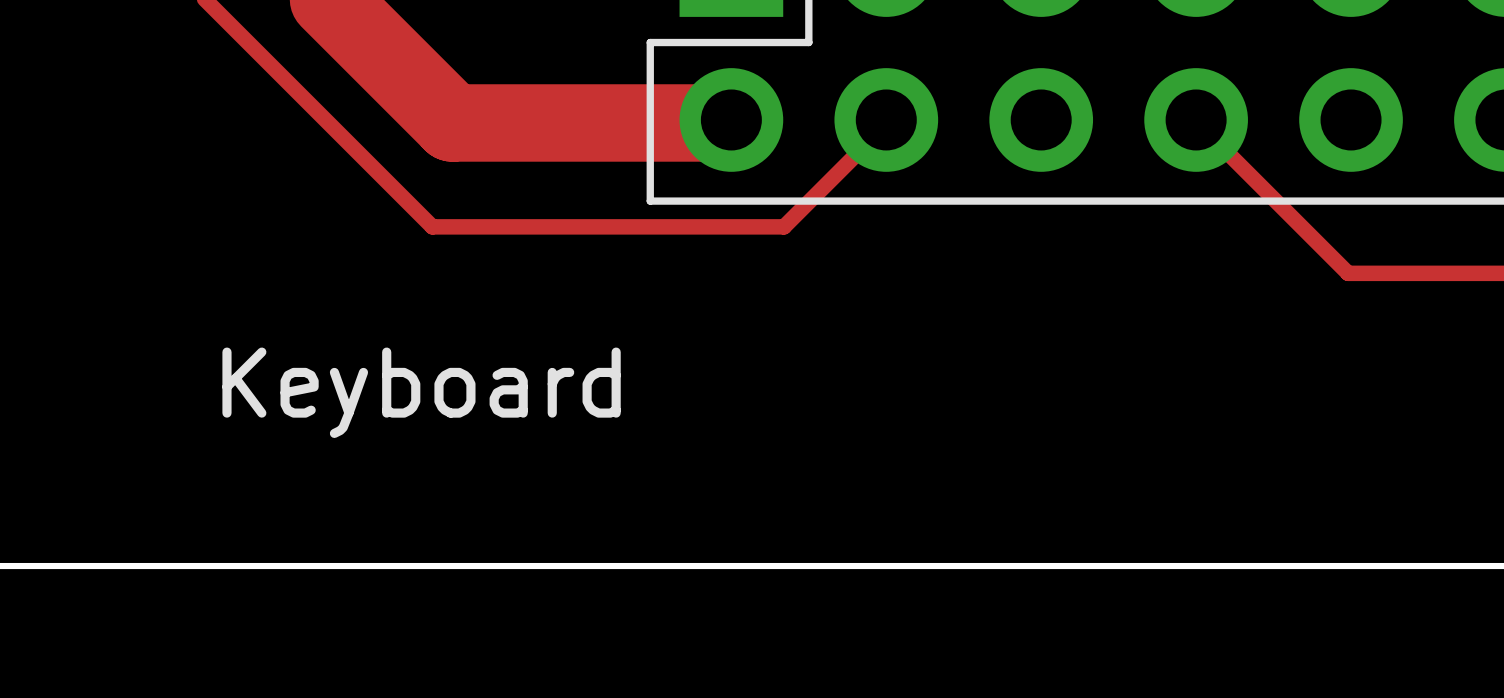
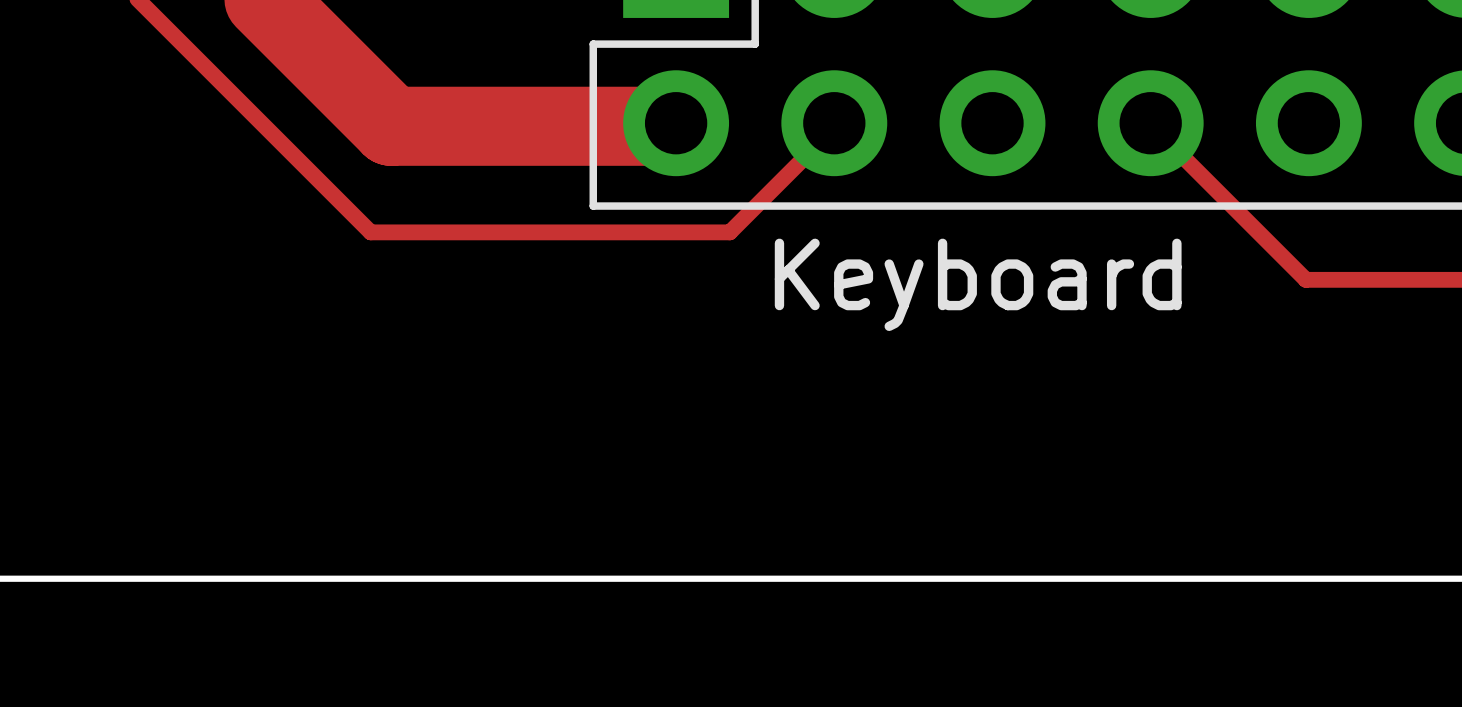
part value position: Keyboard (421, 392) -> Keyboard (978, 284)

